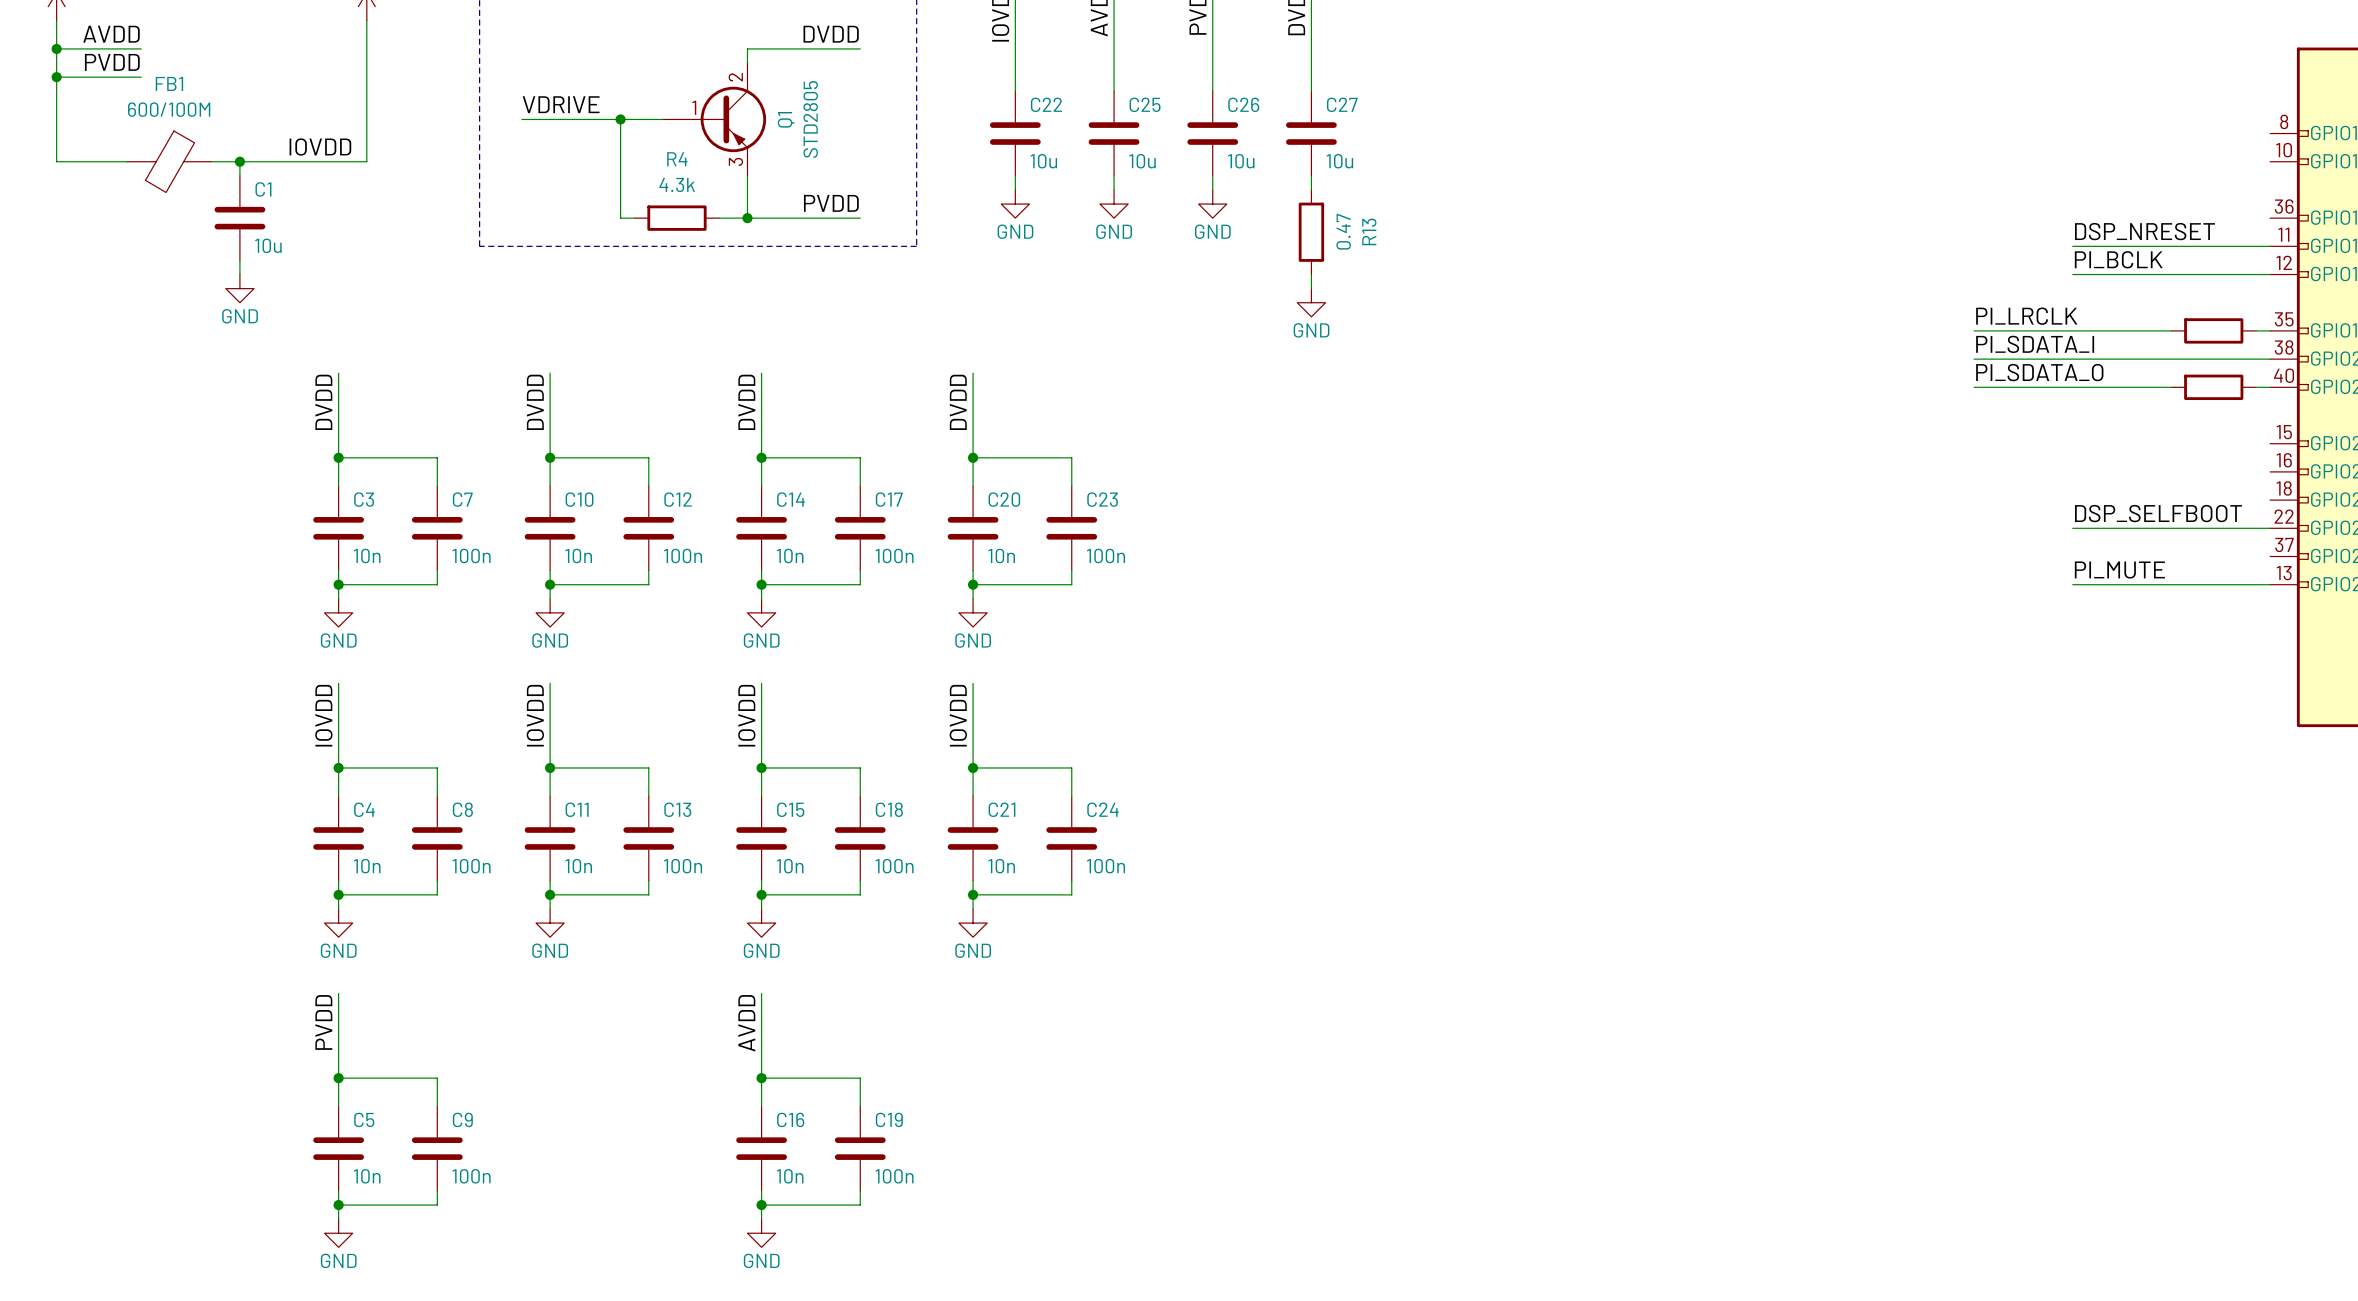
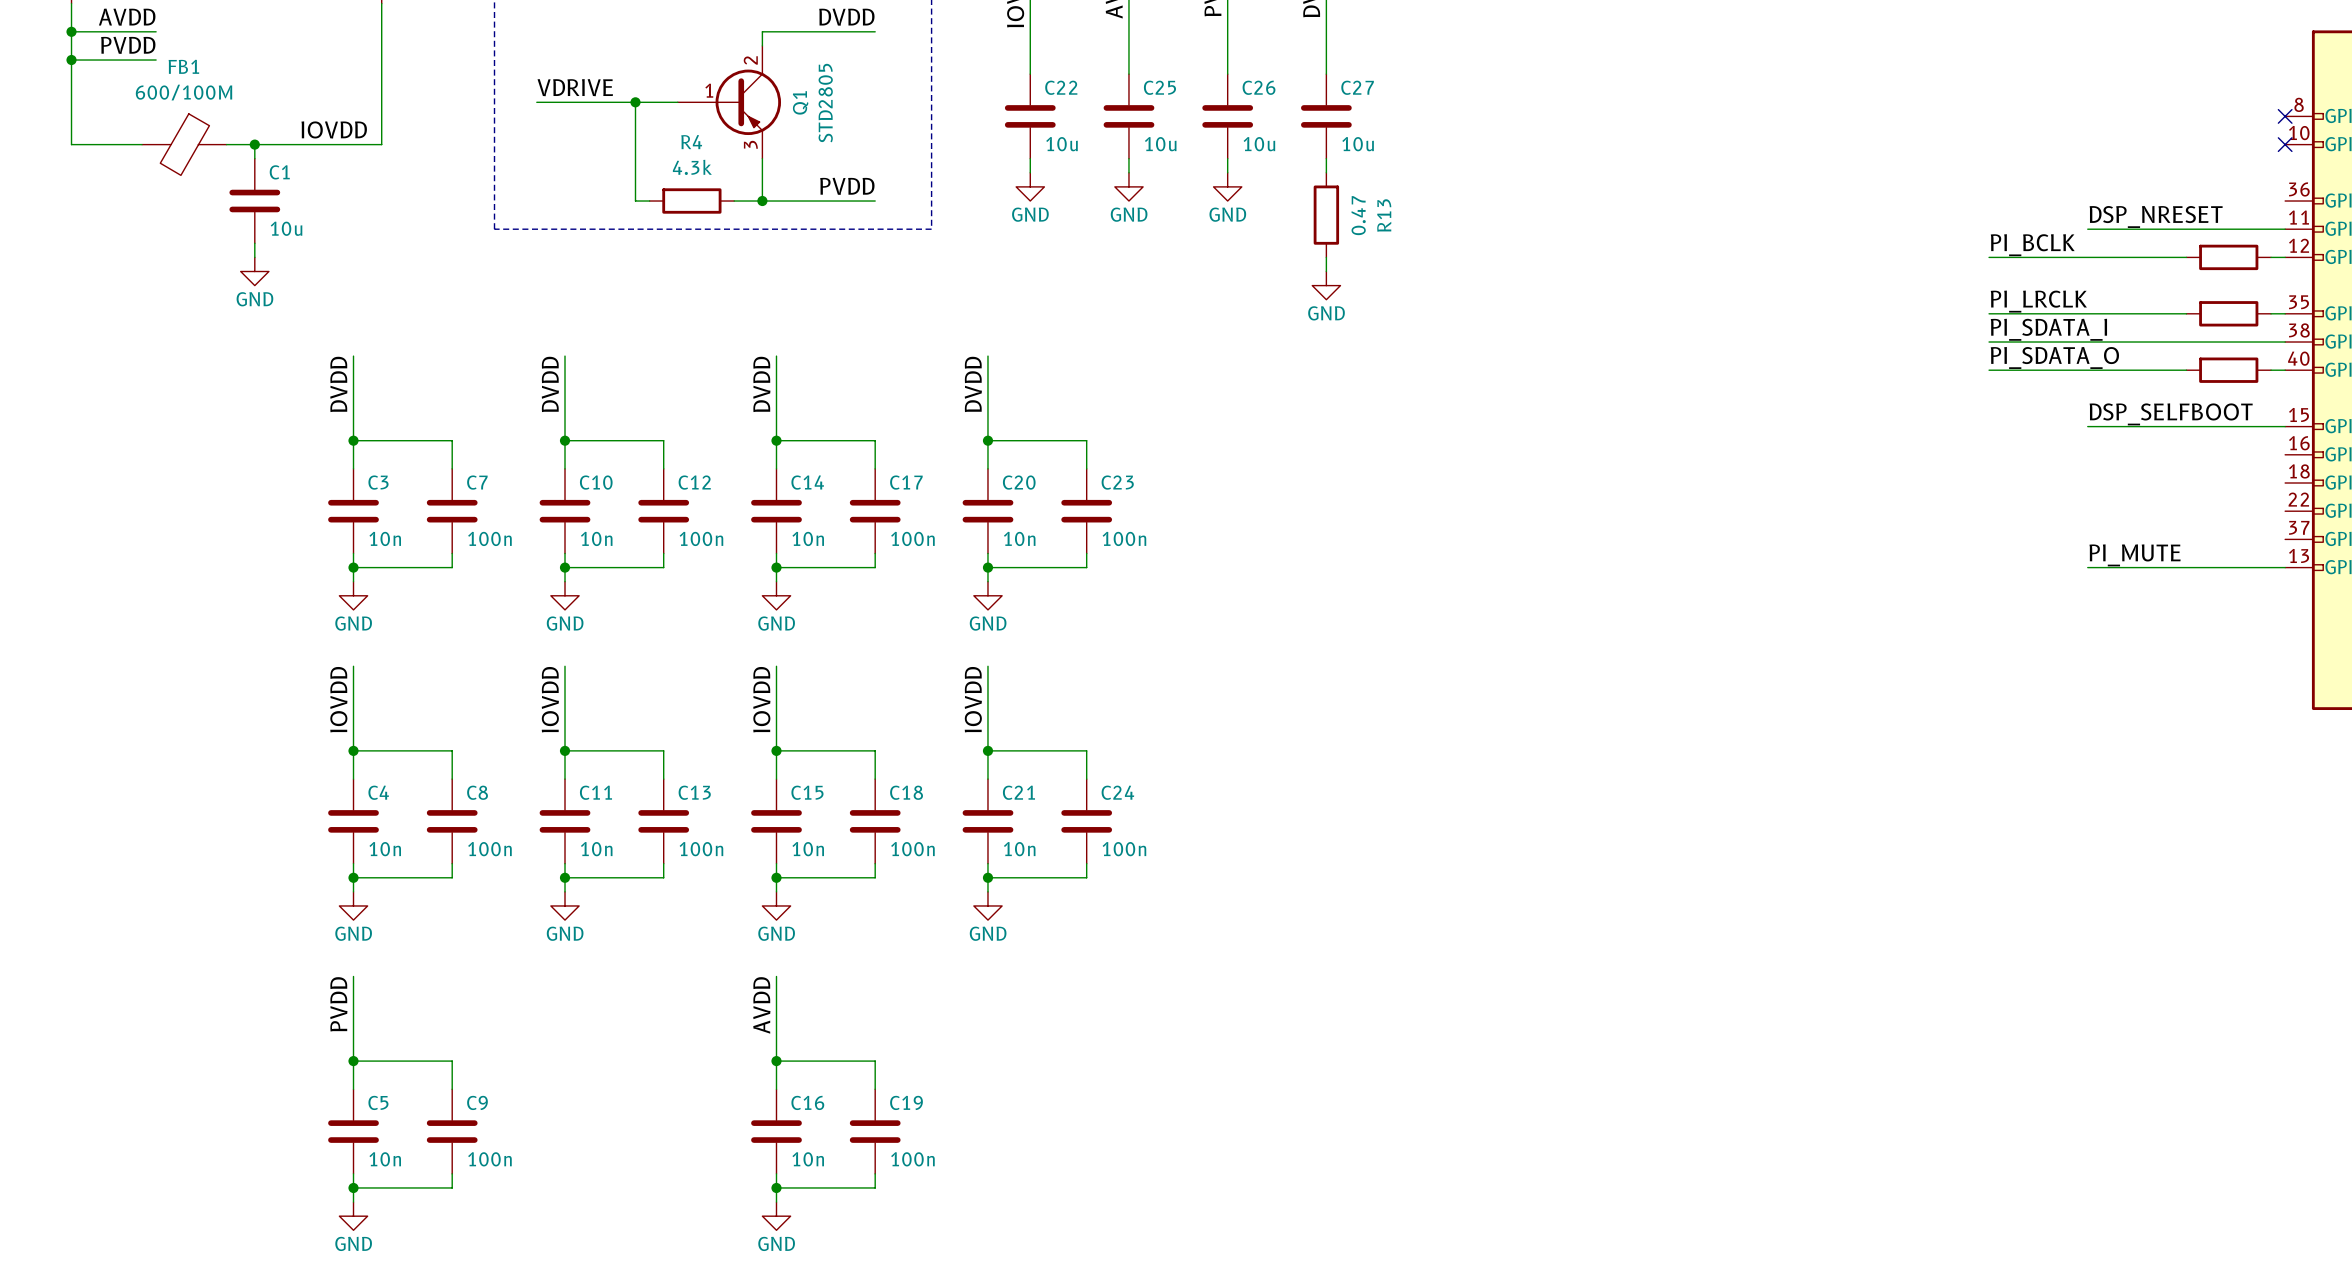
no-connect mark: none -> (2285, 116)
no-connect mark: none -> (2285, 144)
label position: PI_BCLK (2118, 259) -> PI_BCLK (2032, 245)
wire: none -> (1989, 257) (2087, 257)
wire: (2171, 274) (2256, 274) -> none
part: none -> (2228, 257)
label position: DSP_SELFBOOT (2158, 513) -> DSP_SELFBOOT (2171, 414)
wire: (2072, 528) (2270, 528) -> (2087, 426) (2285, 426)

